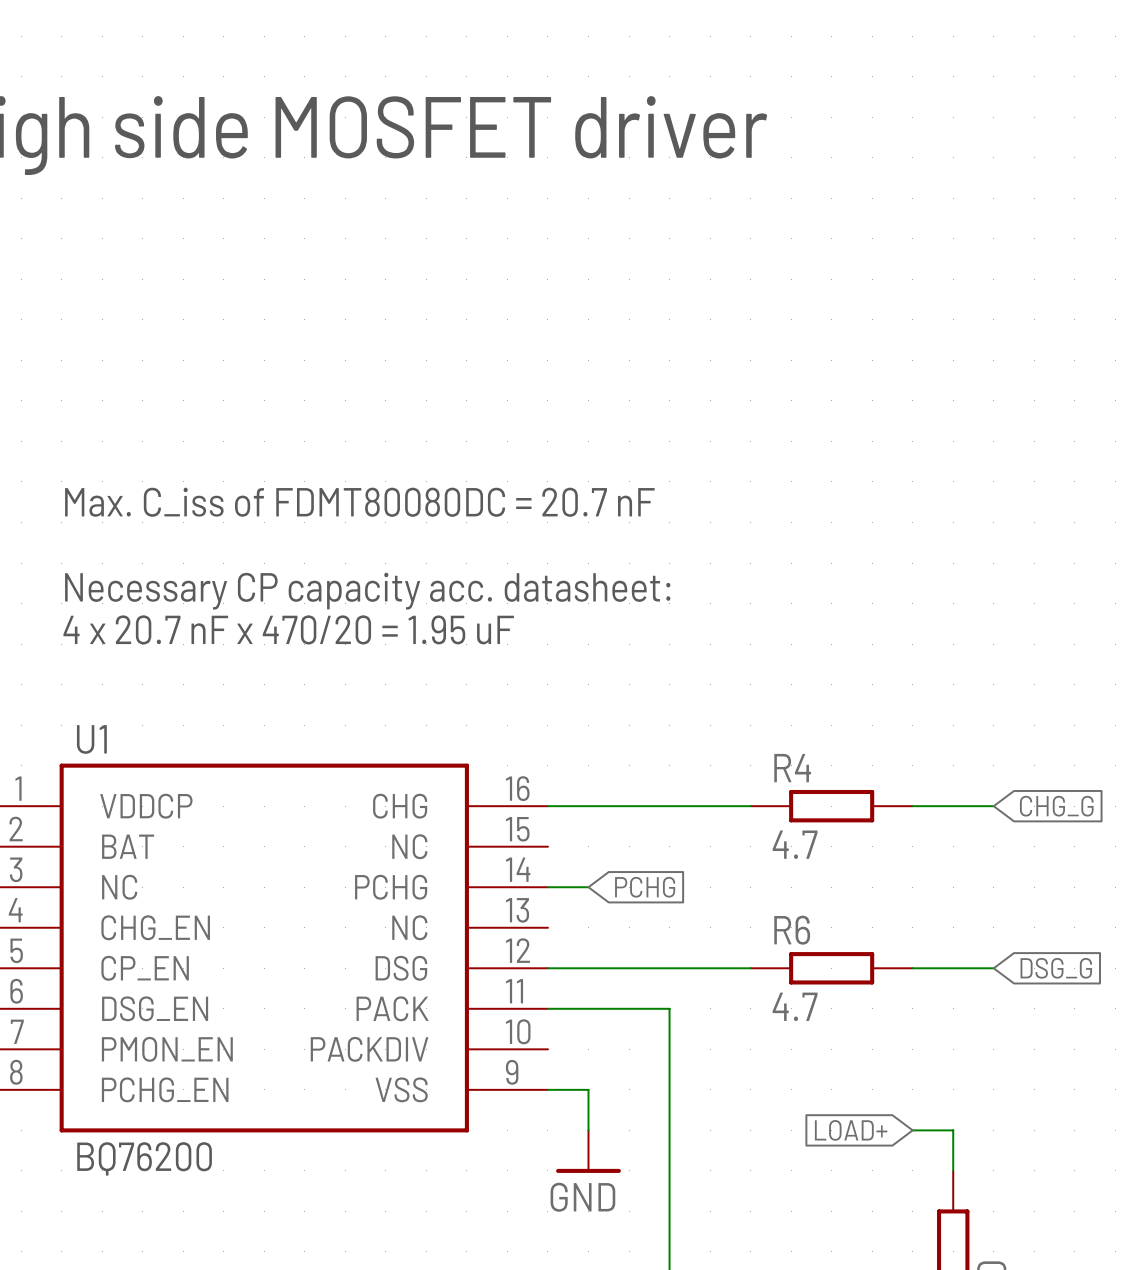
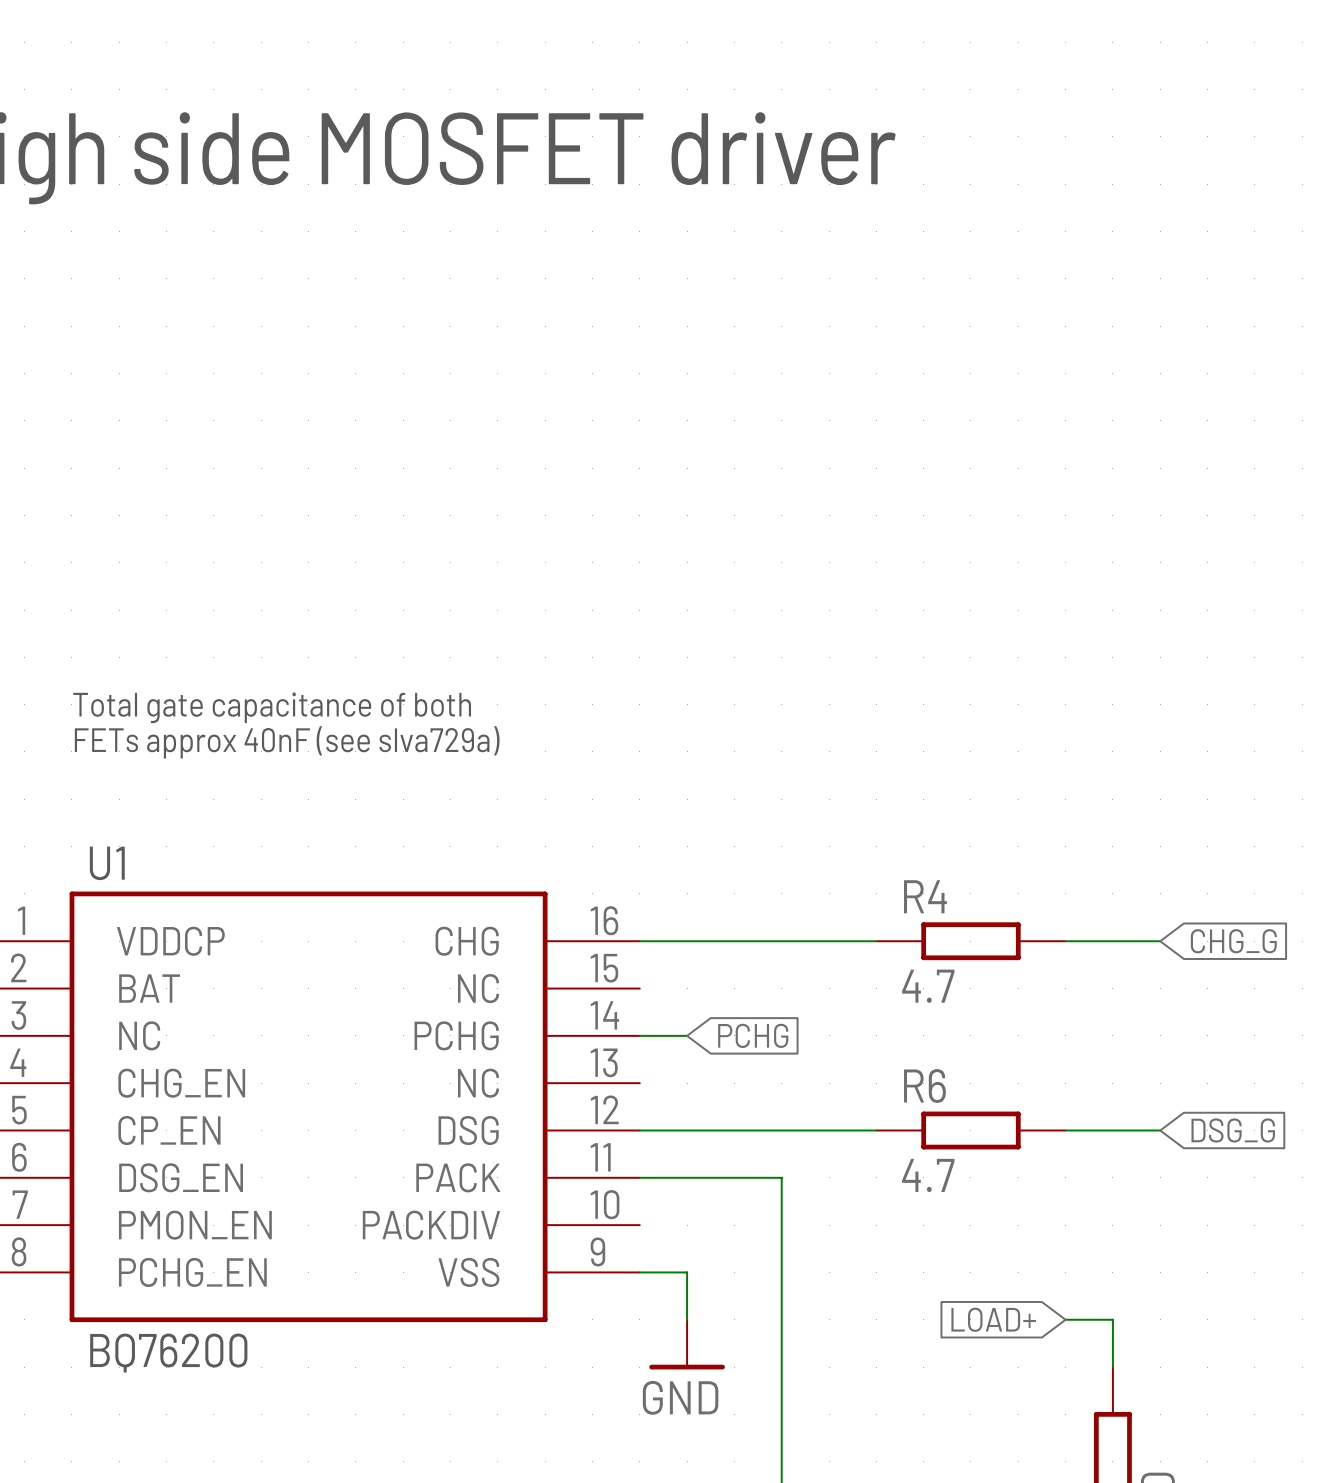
text: Max. C_iss of FDMT80080DC = 20.7 nF (359, 502) -> none
text: Necessary CP capacity acc. datasheet: (367, 591) -> Total gate capacitance of both (272, 707)
text: 4 x 20.7 nF x 470/20 = 1.95 uF (288, 629) -> FETs approx 40nF (see slva729a) (287, 742)

